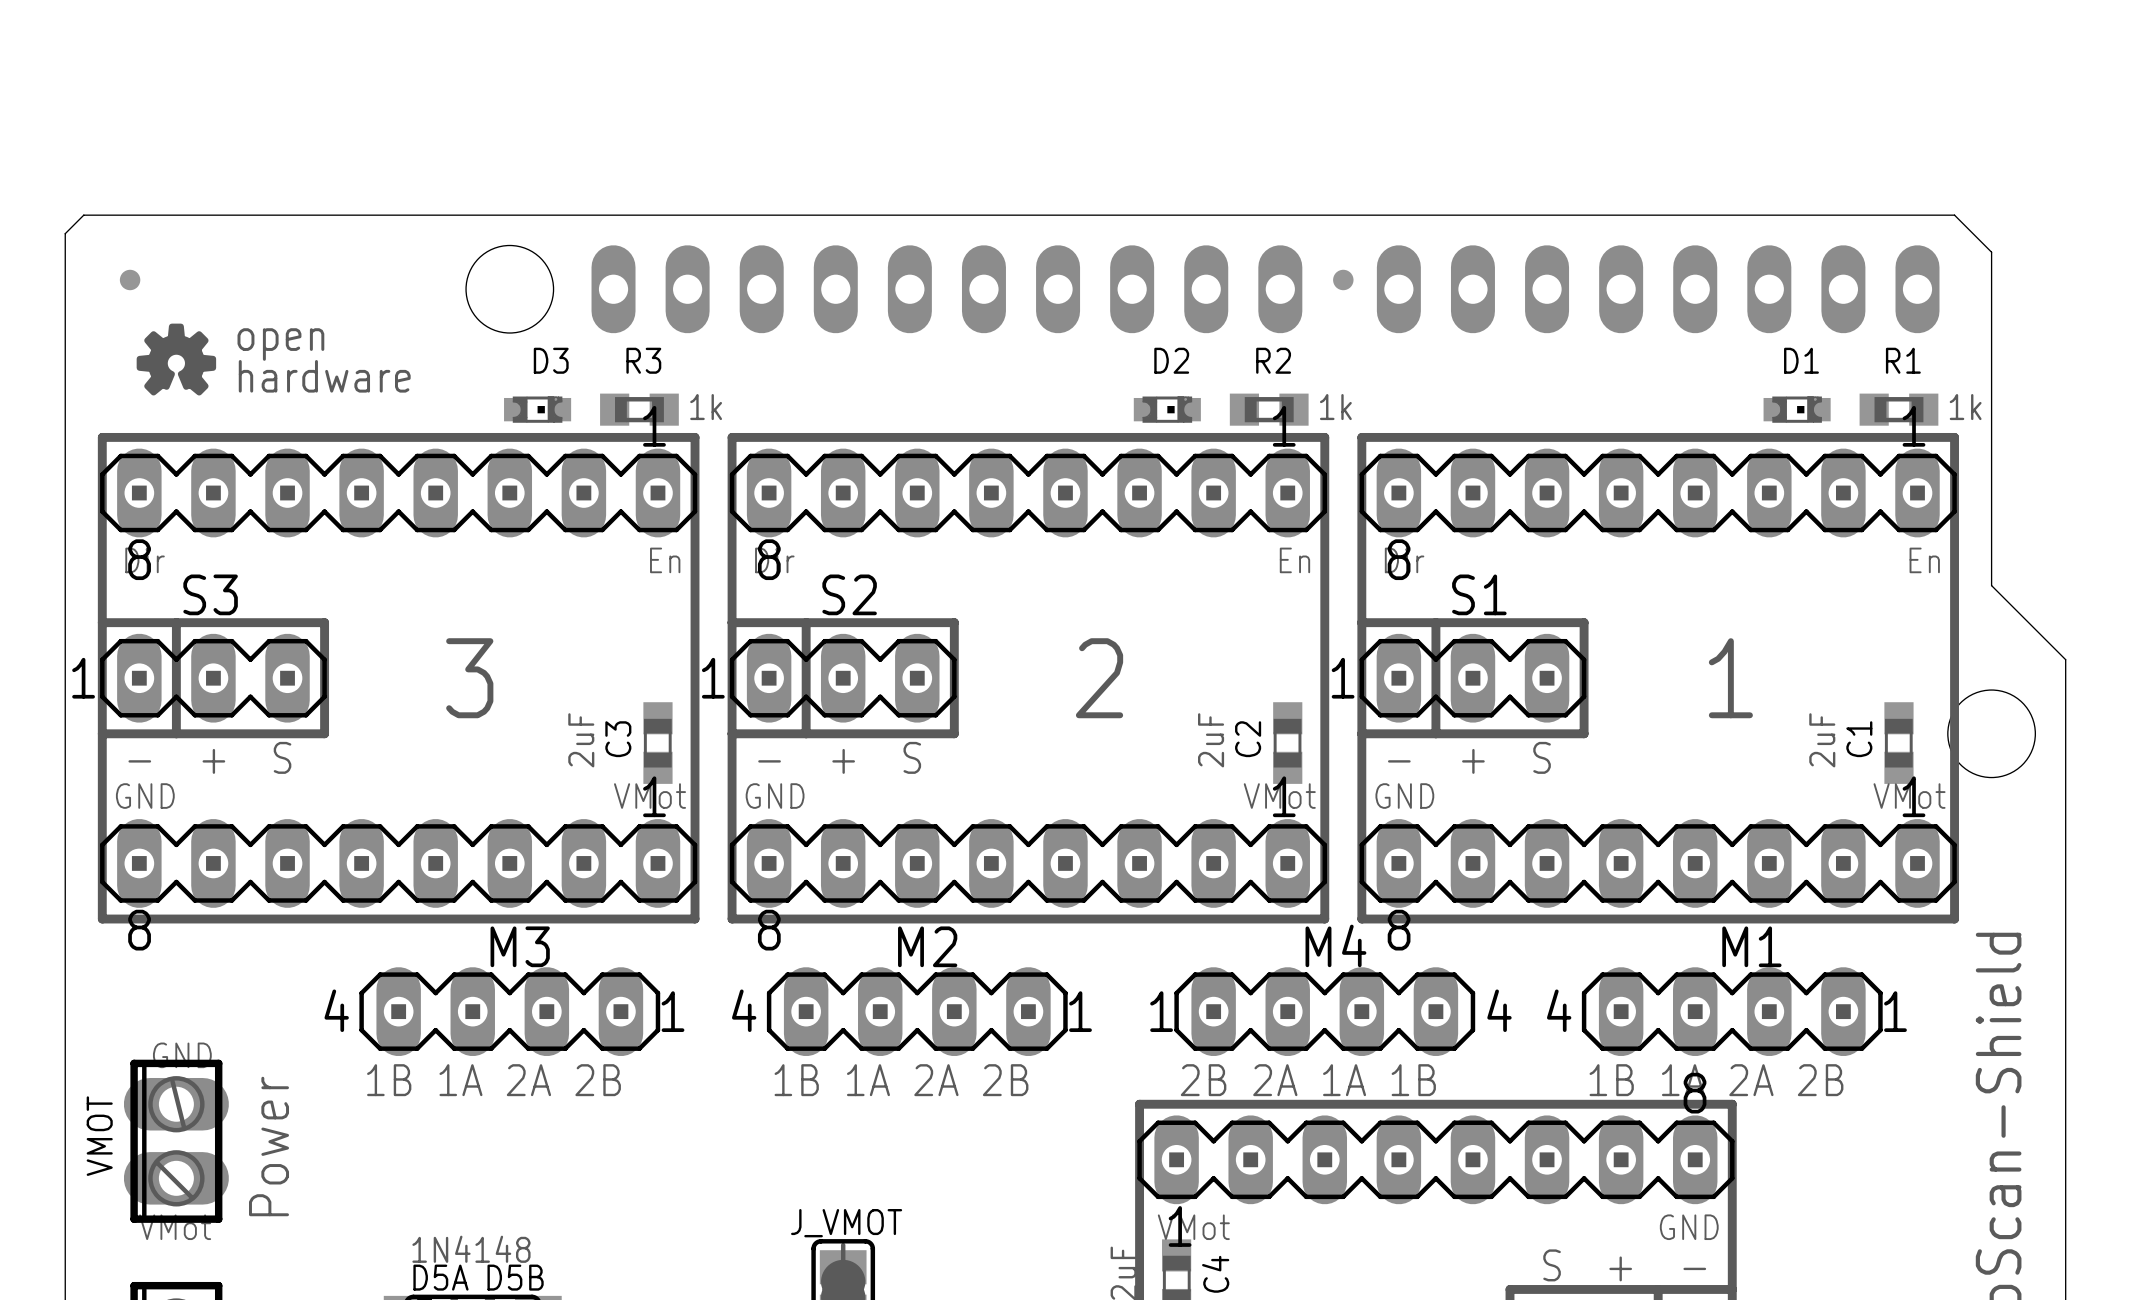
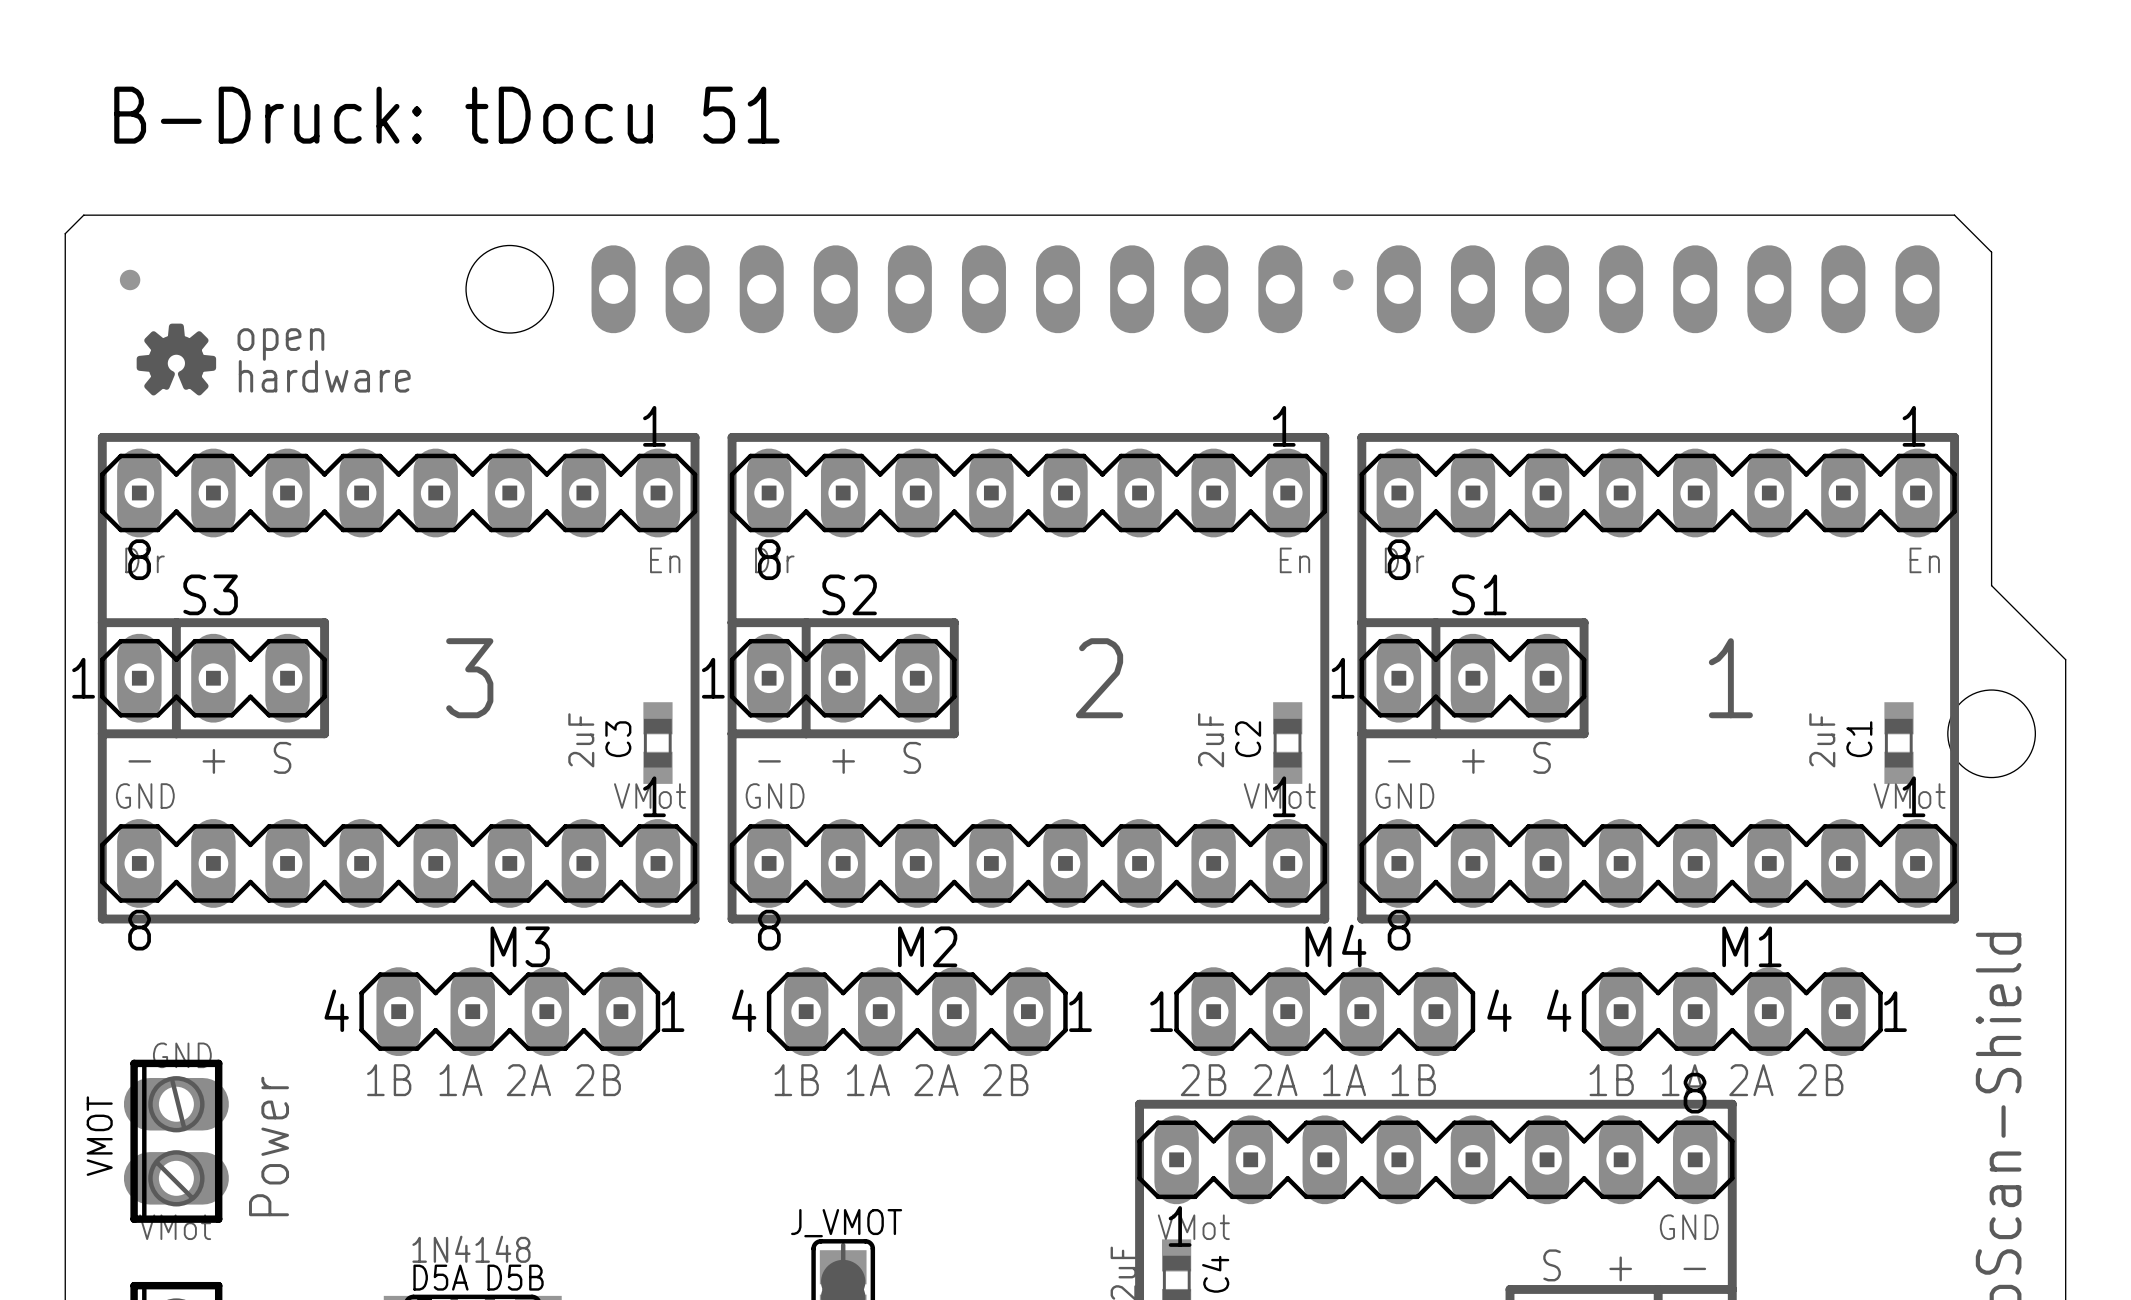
text: none -> B-Druck: tDocu 51 (446, 115)
D3: (537, 409) -> none
R3: 1k (639, 409) -> none
D2: (1167, 409) -> none
R2: 1k (1269, 409) -> none
D1: (1797, 409) -> none
R1: 1k (1898, 409) -> none

